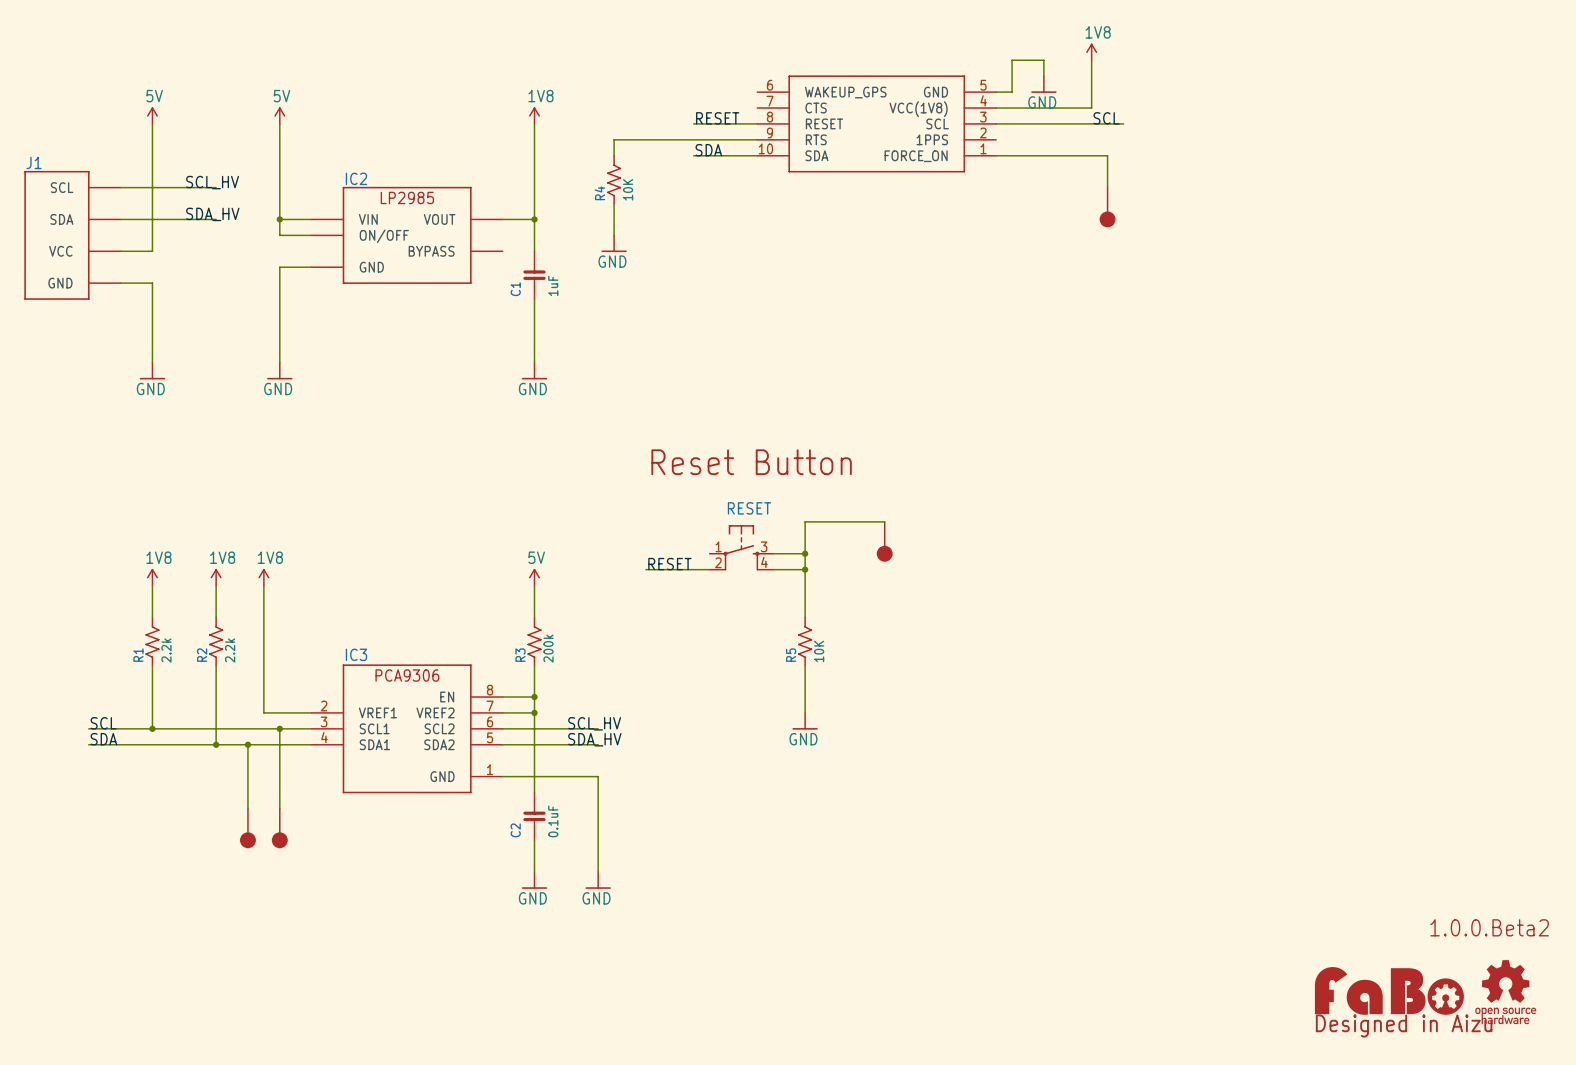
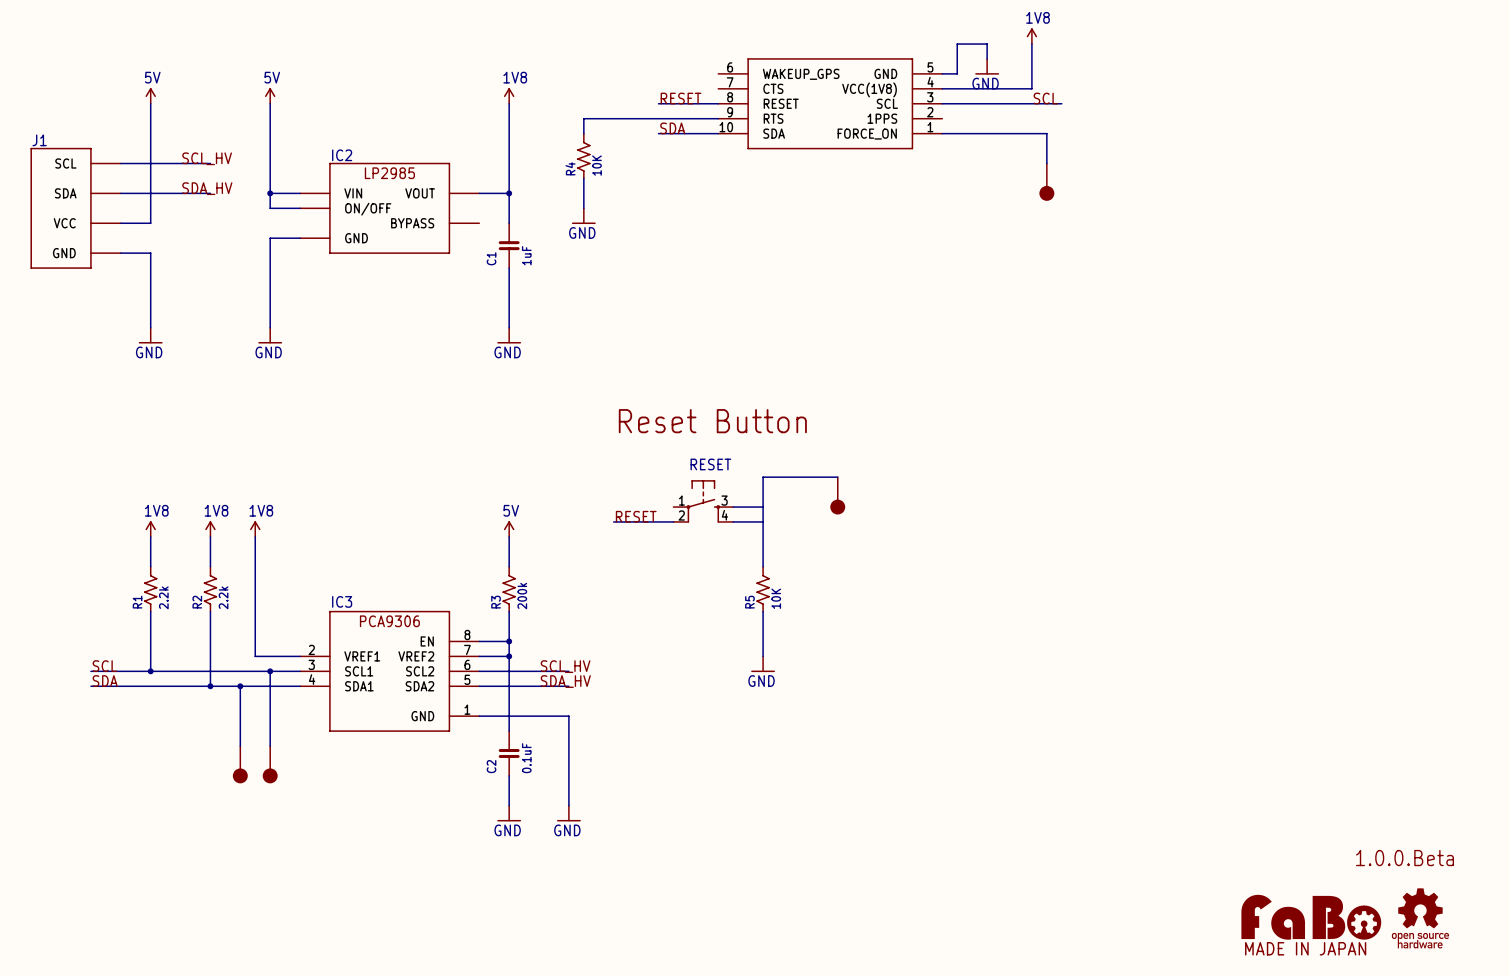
junction: (805, 553) -> none
junction: (805, 569) -> none
text: 1.0.0.Beta2 (1489, 927) -> 1.0.0.Beta (1405, 858)
part text: none -> MADE IN JAPAN (1305, 948)
part text: Designed in Aizu (1404, 1026) -> none

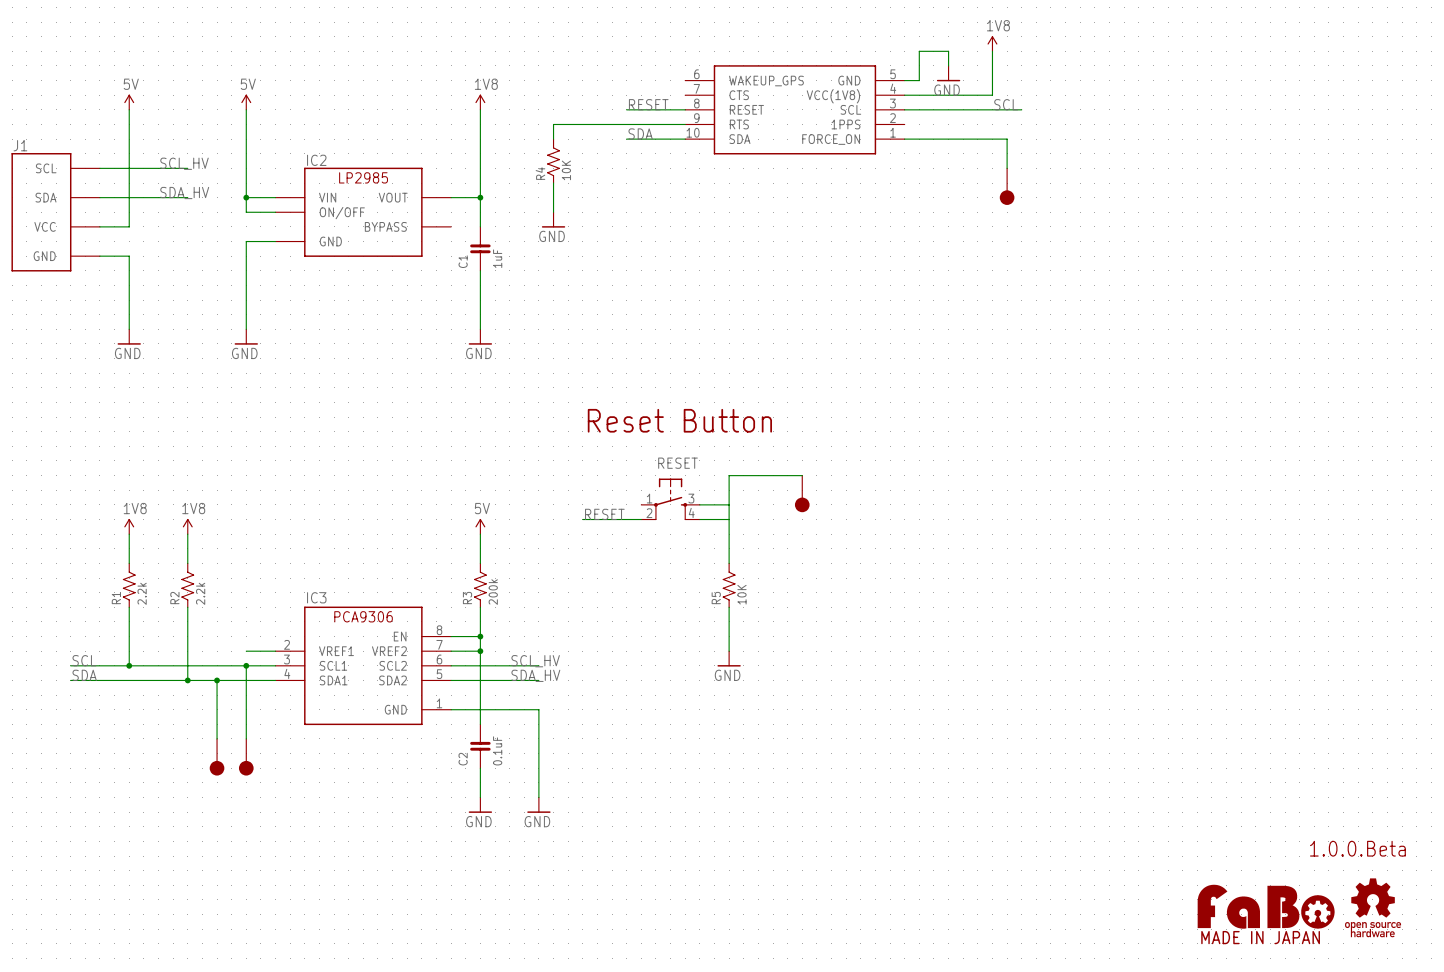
power symbol: 1V8 (255, 529) -> none
wire: (255, 536) (255, 656) (270, 656) -> none

